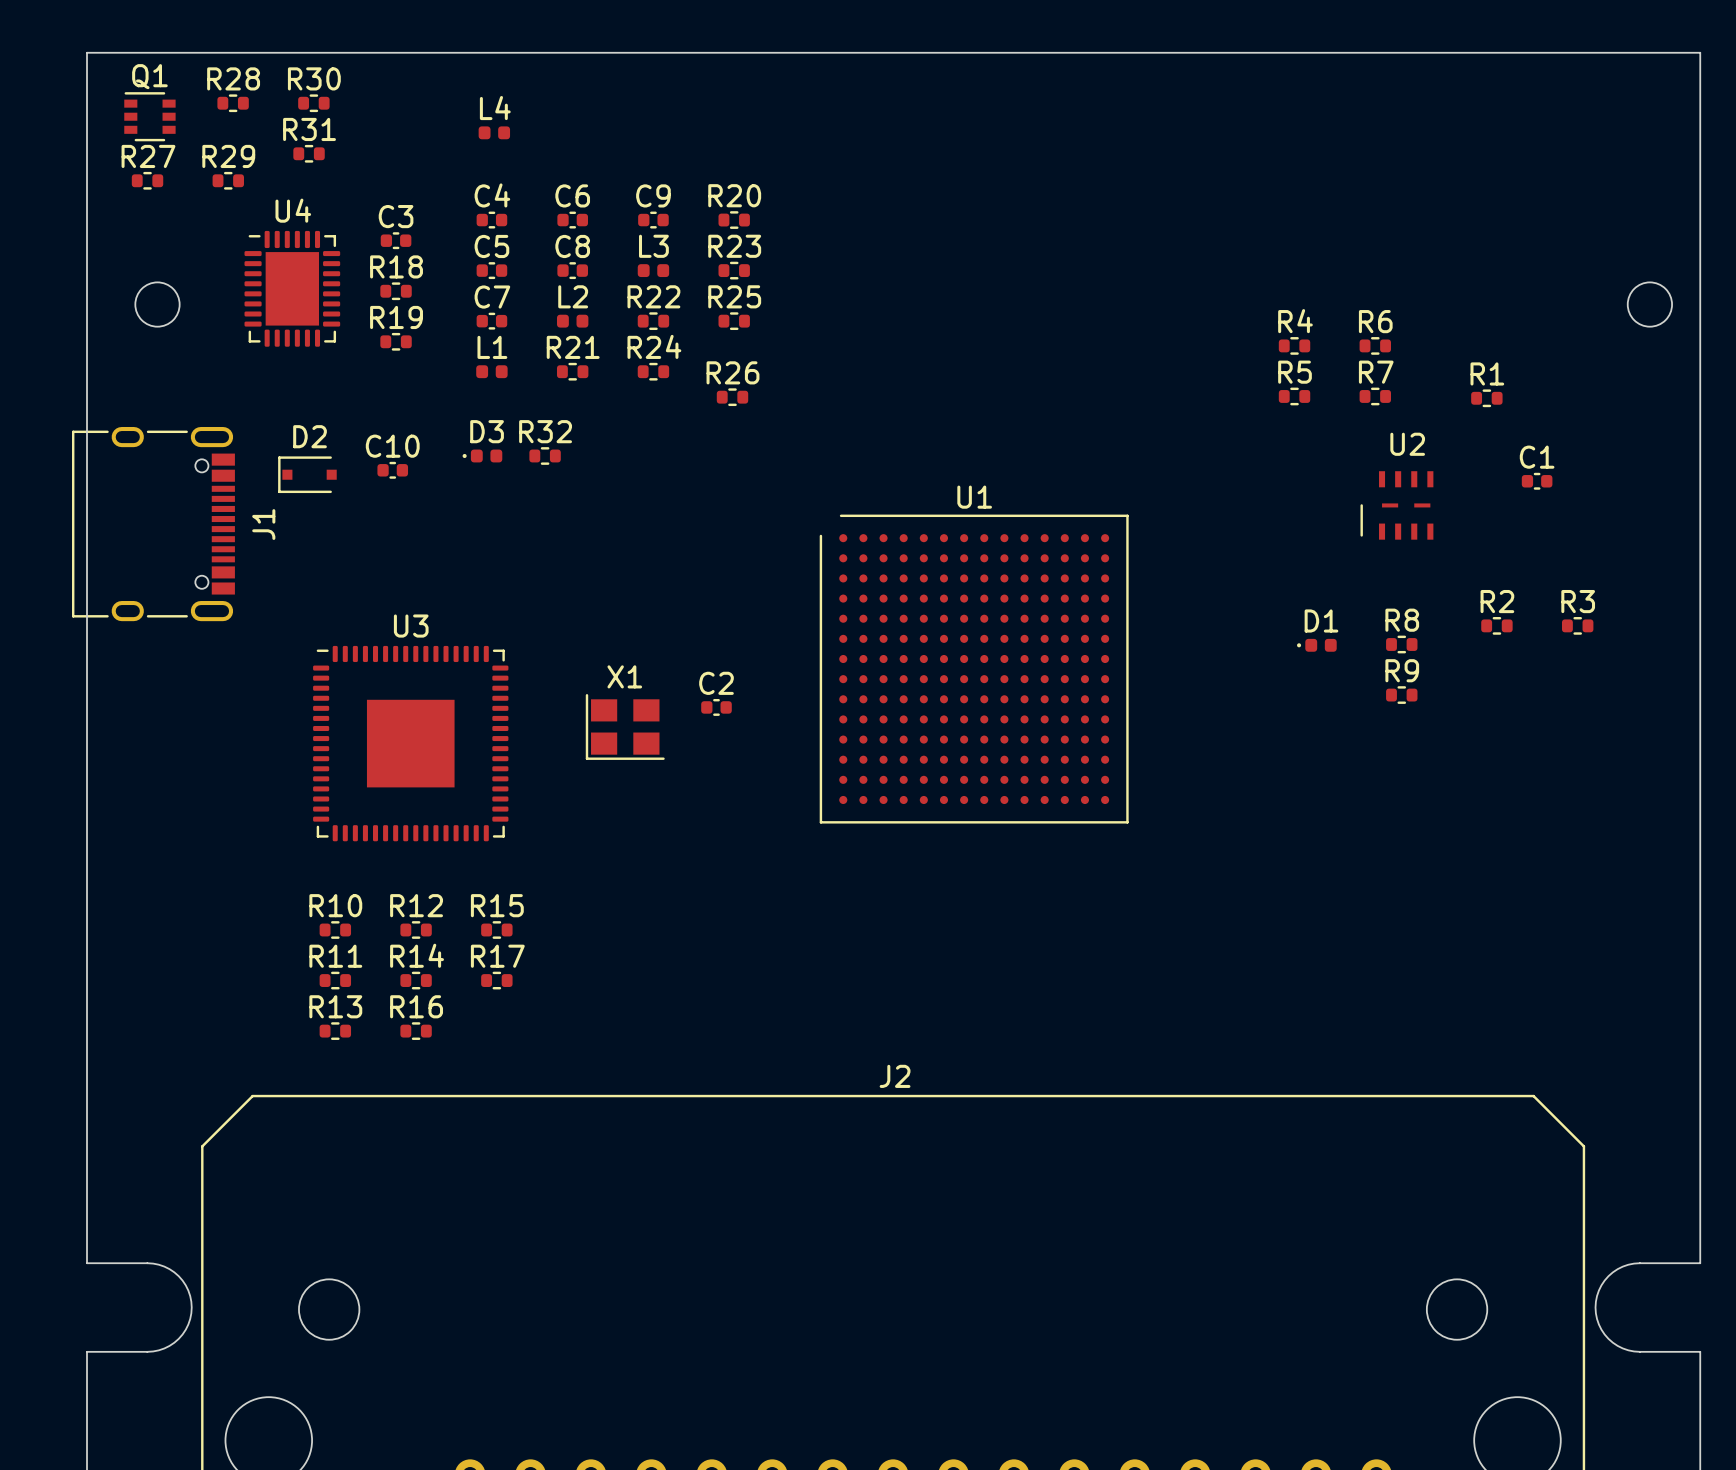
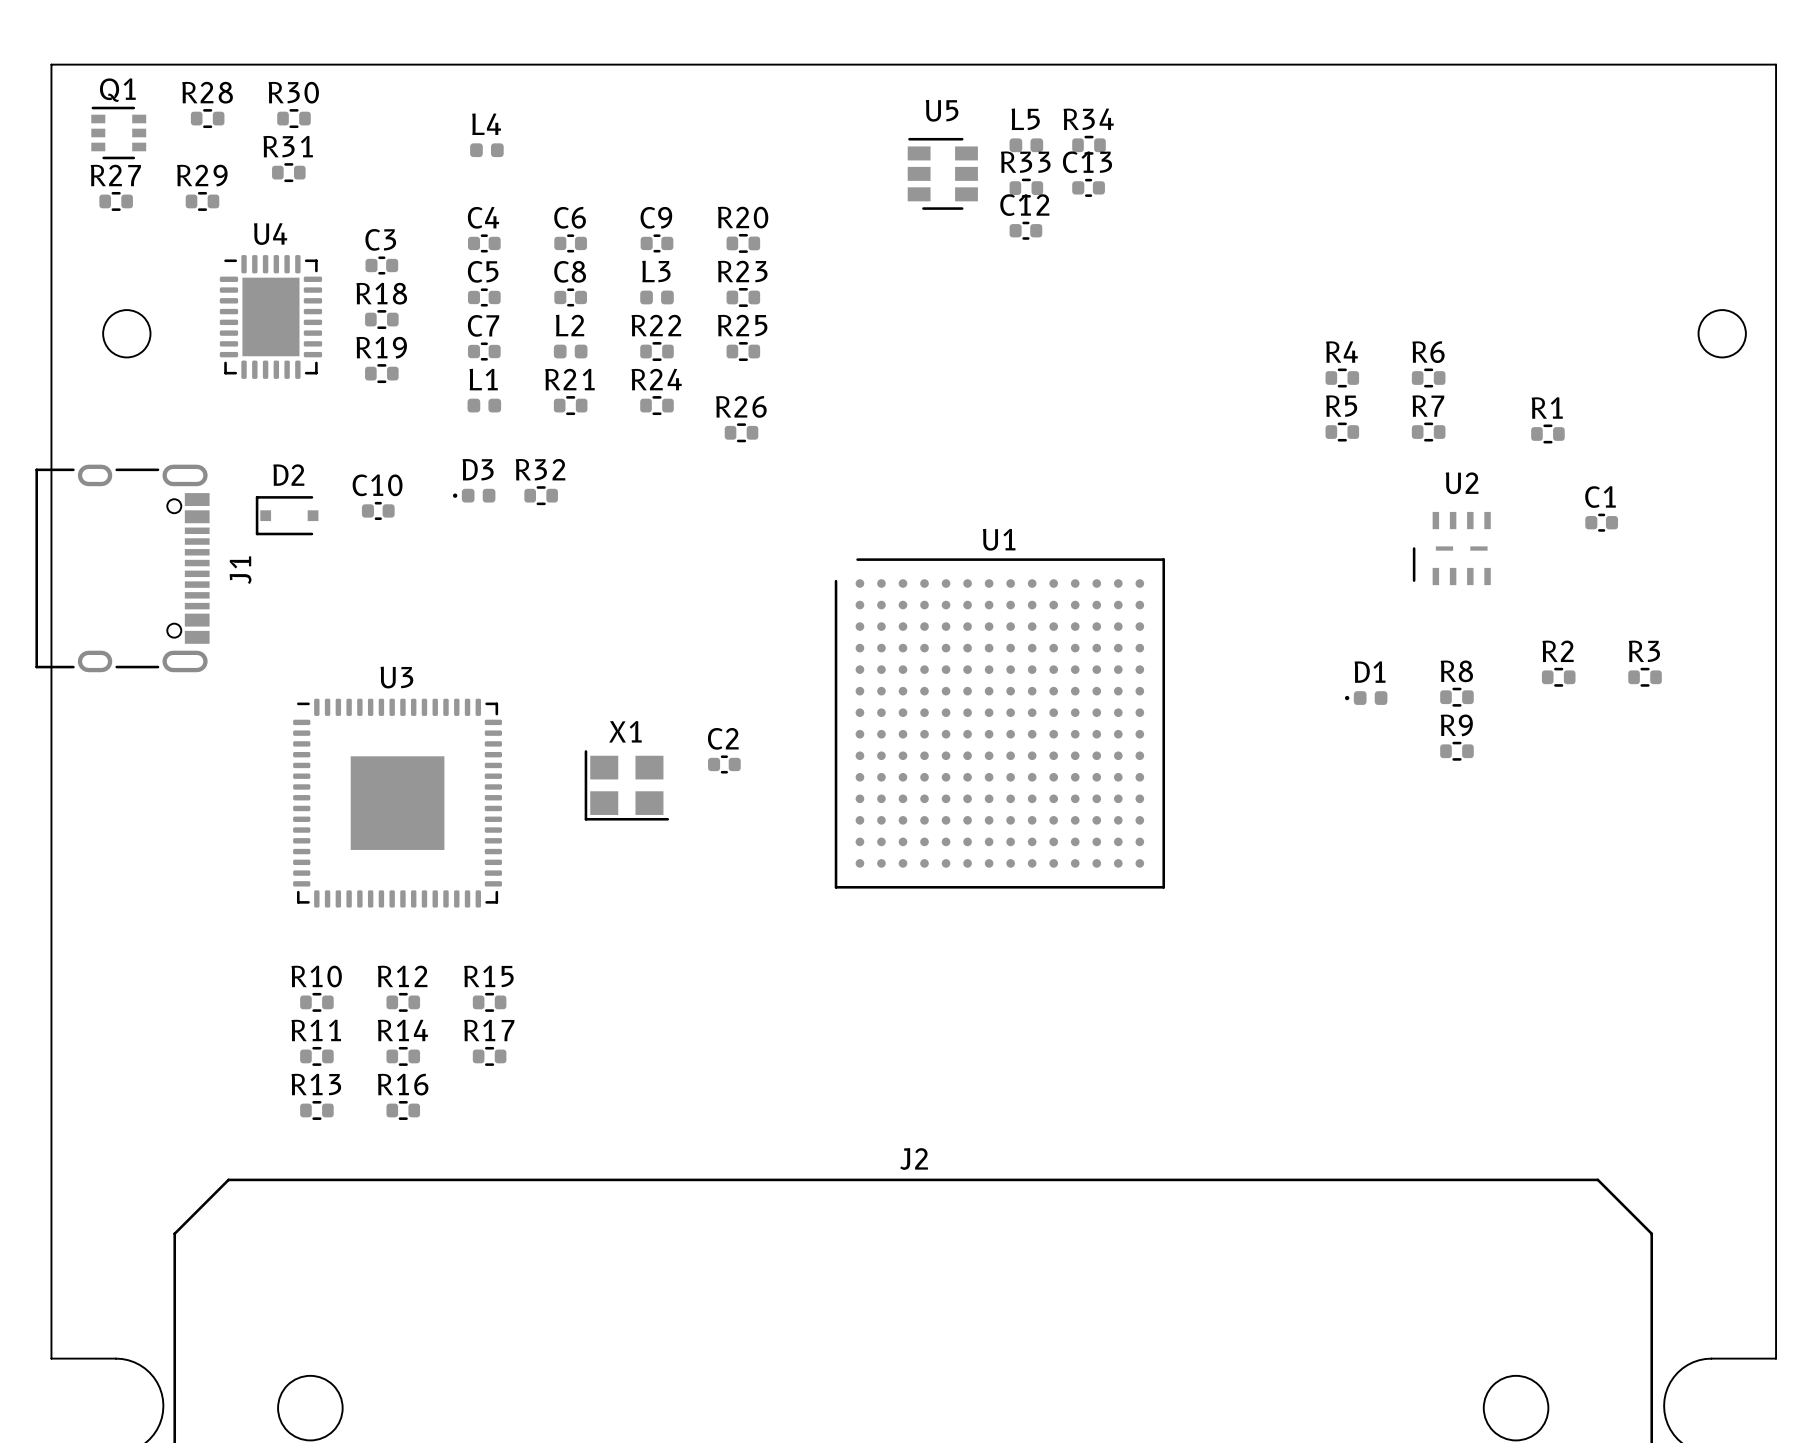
L5: none -> (1026, 145)
R34: none -> (1089, 145)
U5: none -> (942, 173)
R33: none -> (1026, 188)
C13: none -> (1088, 187)
C12: none -> (1025, 230)

